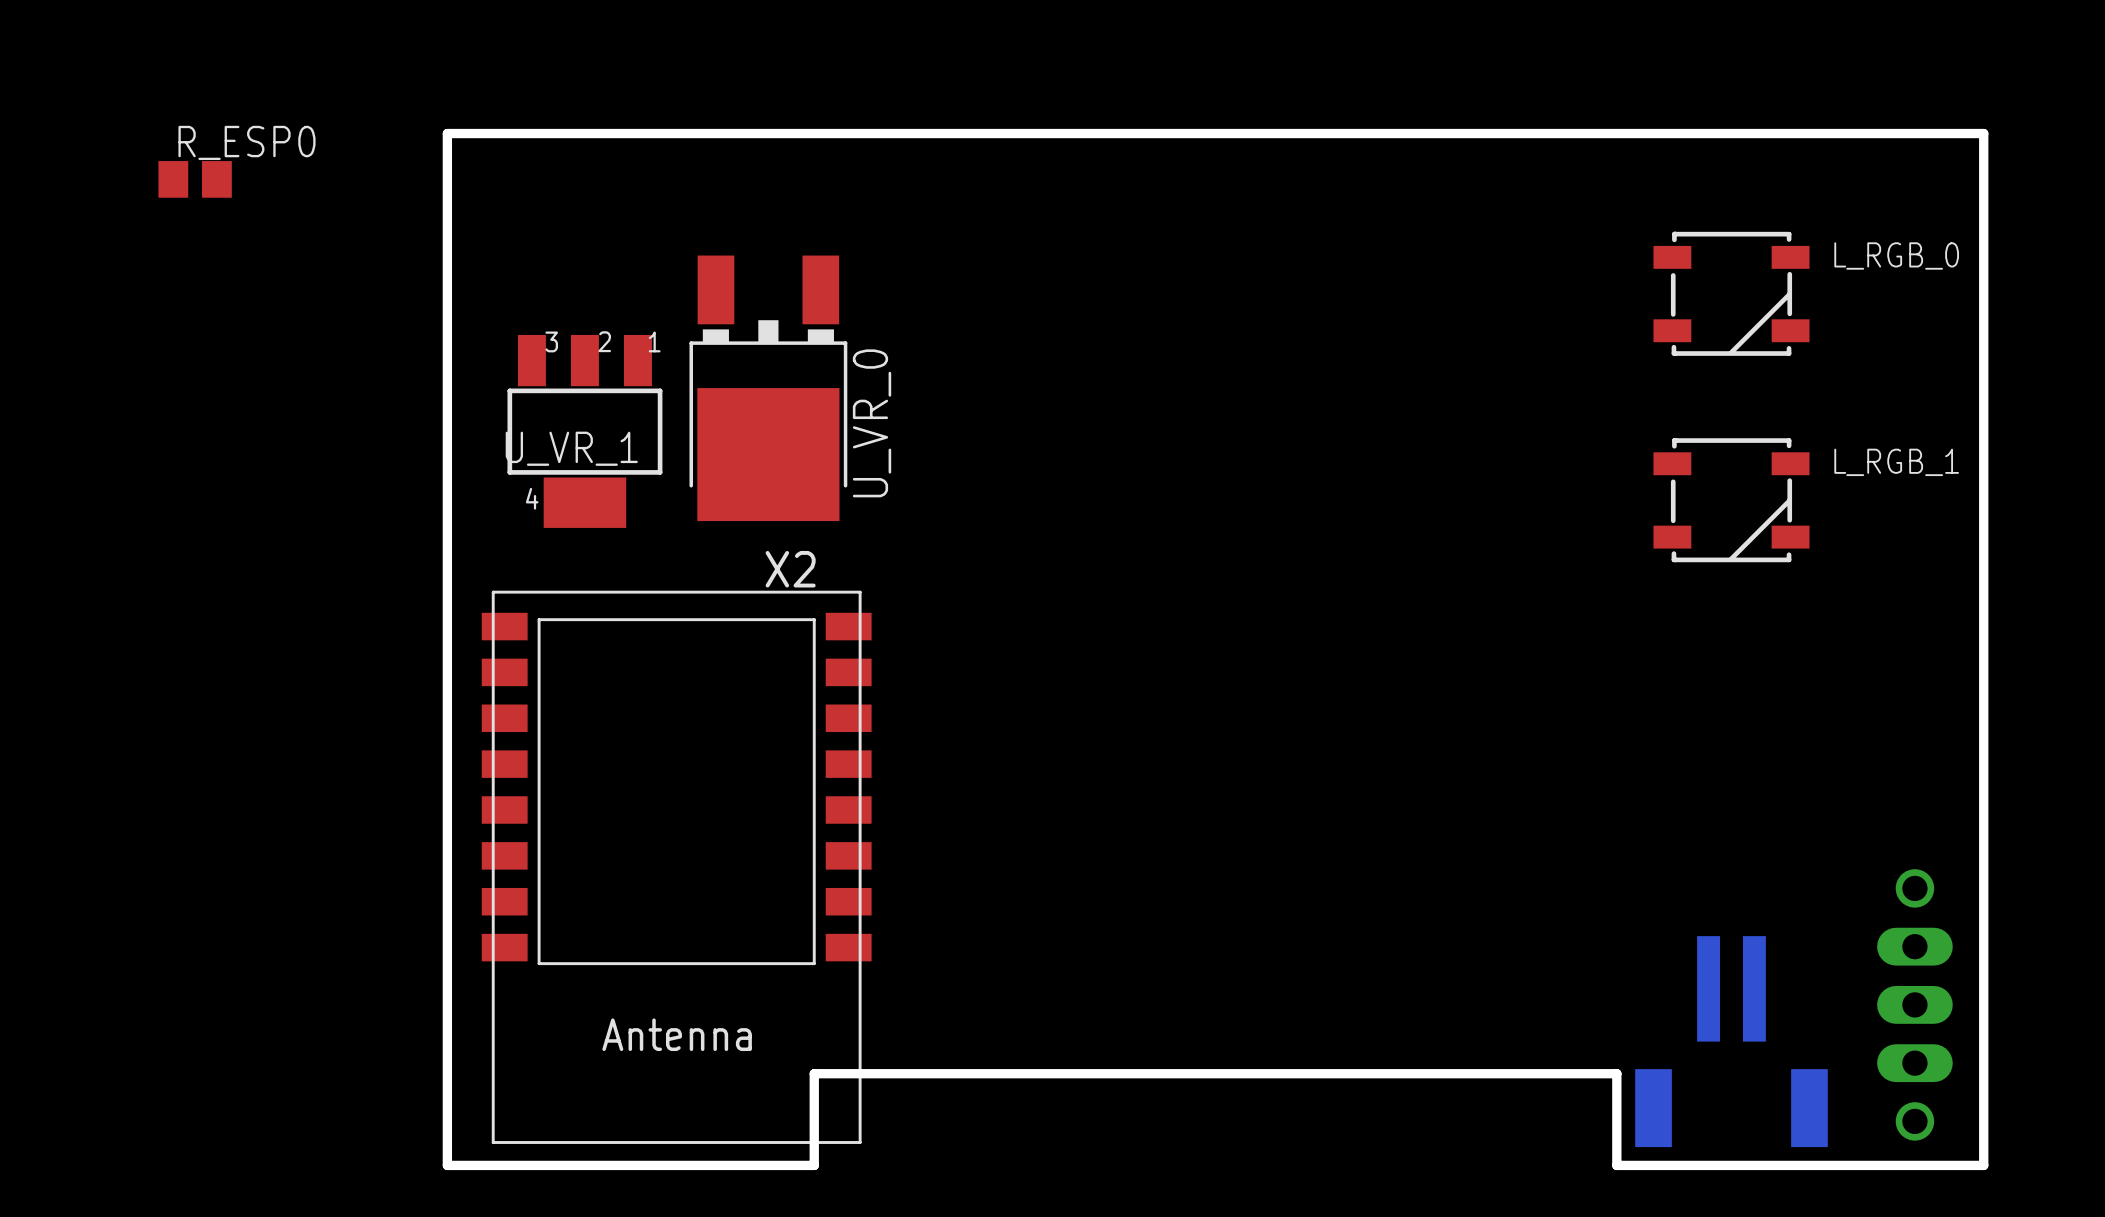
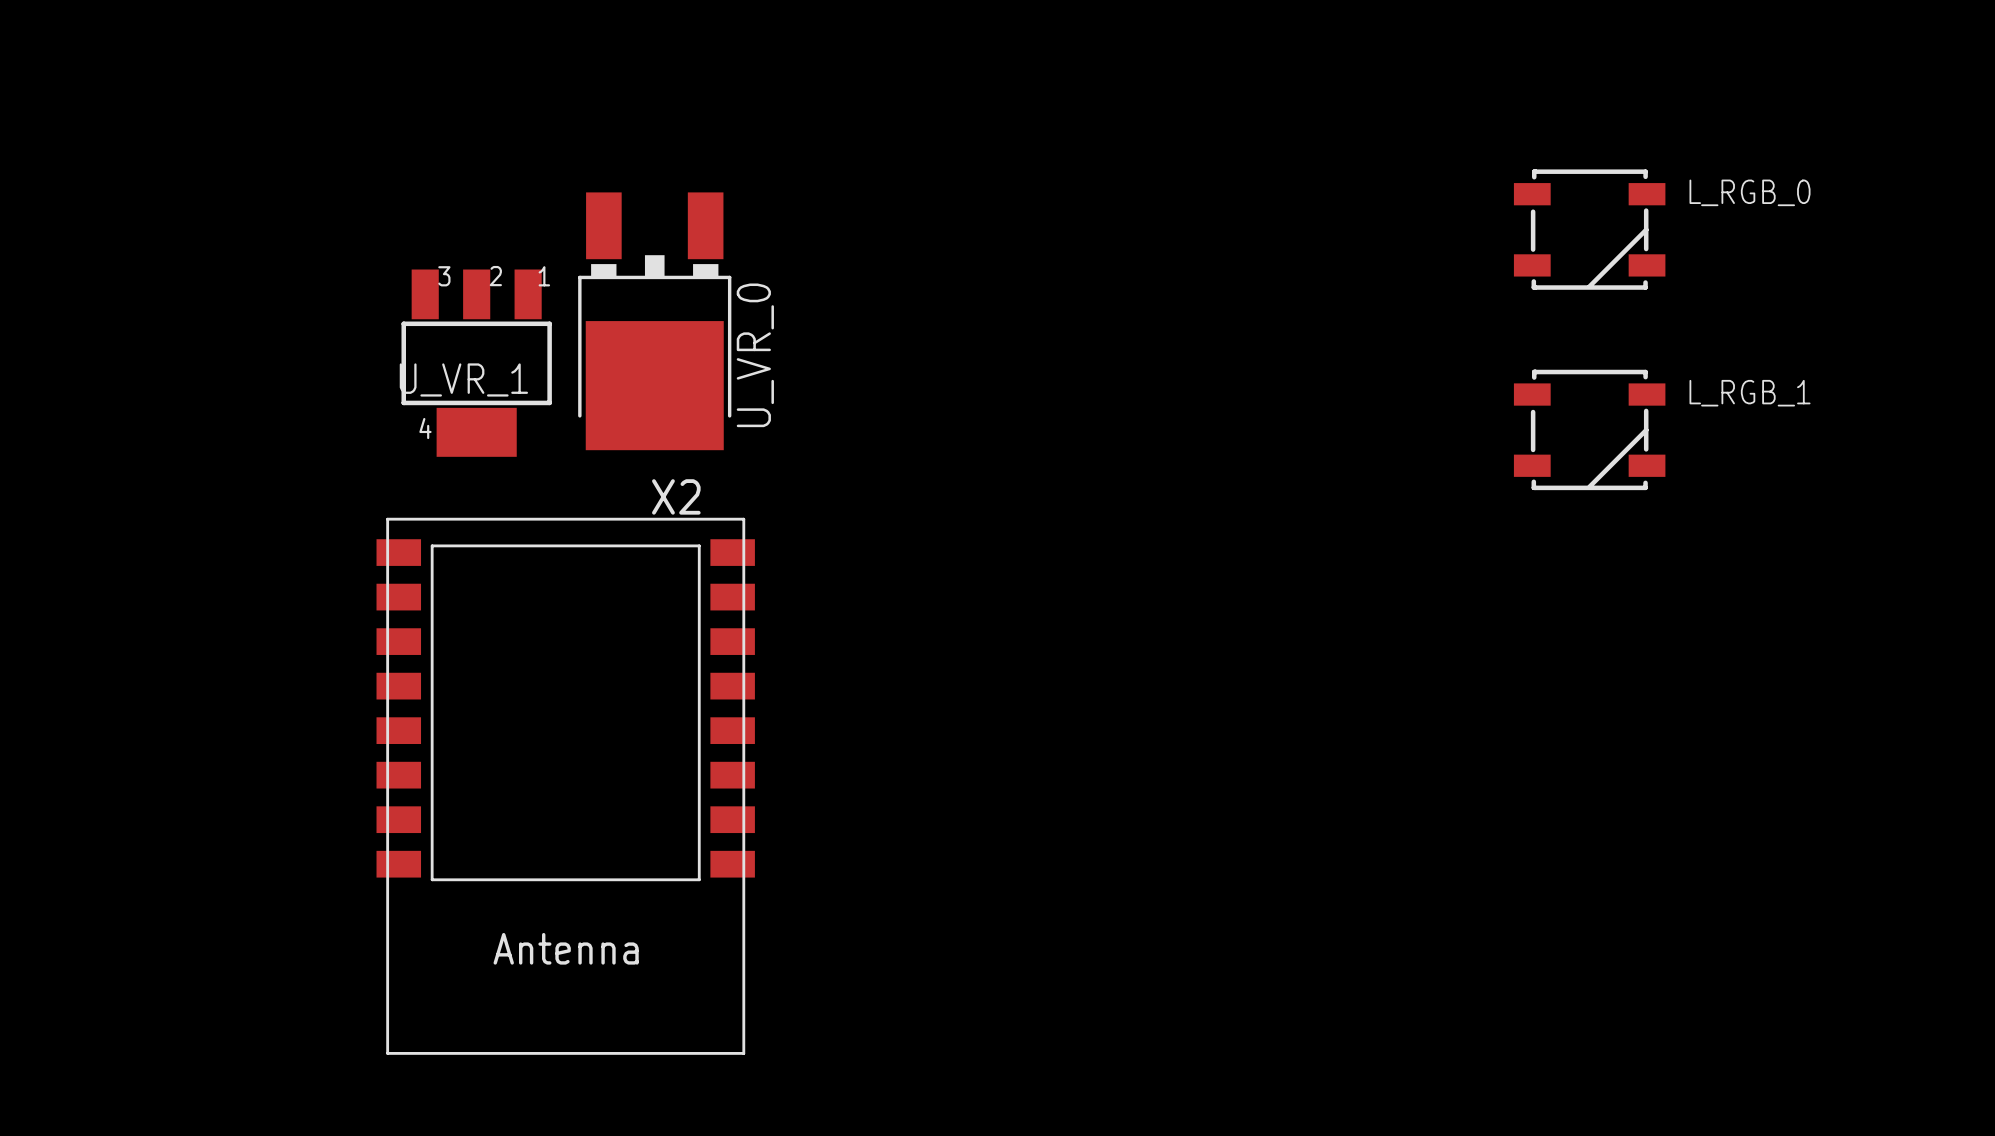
board edge: (447, 133) (447, 1165) (814, 1165) (814, 1073) (1616, 1073) (1616, 1165) (1983, 1165) (1983, 133) (447, 133) -> none
R_ESP0: (195, 179) -> none
part: (1914, 1004) -> none
part: (1731, 1041) -> none

